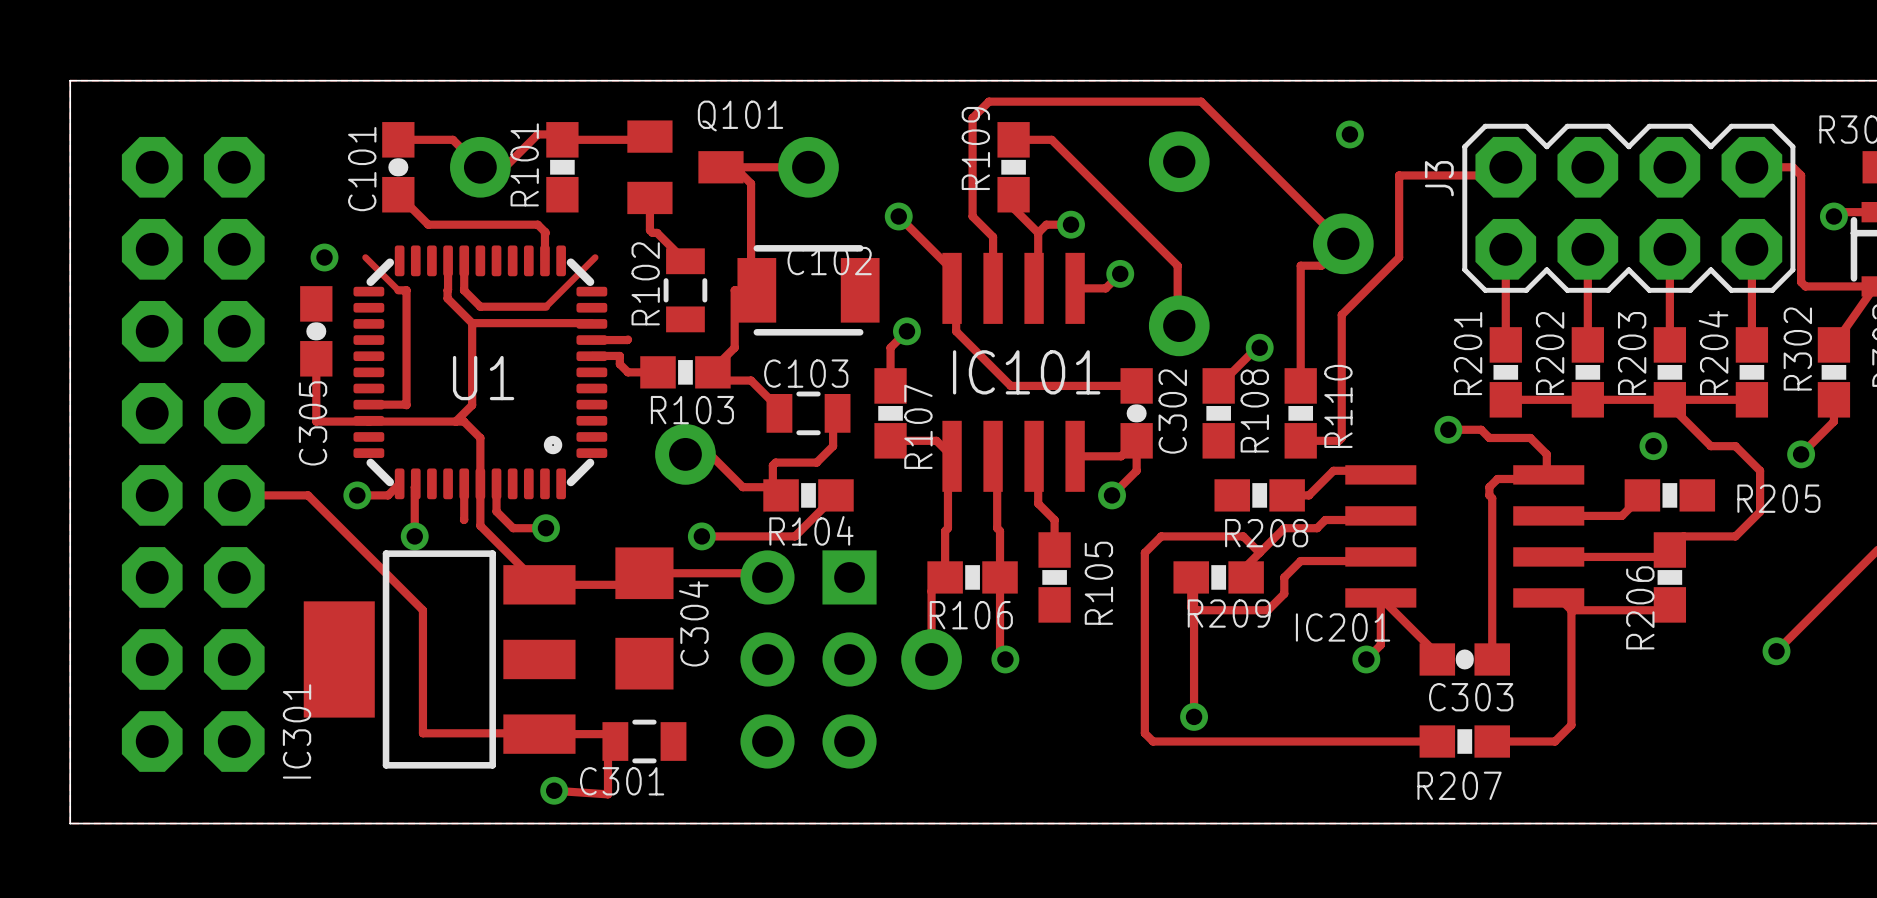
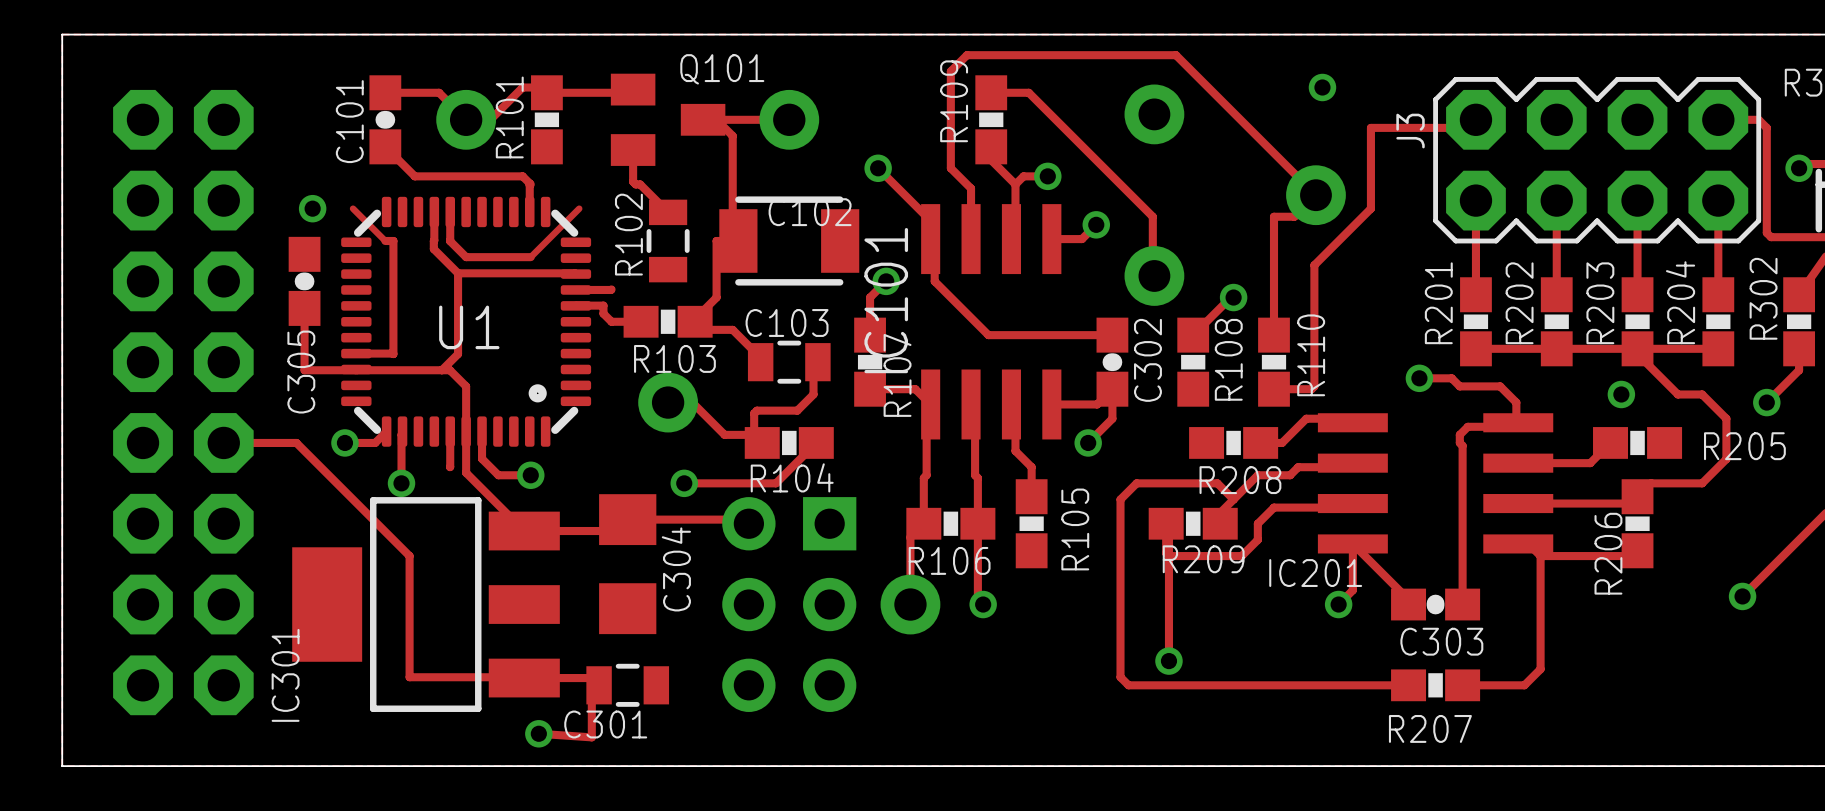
IC101 name rotation: 0° (1026, 372) -> 90° counterclockwise (886, 300)

